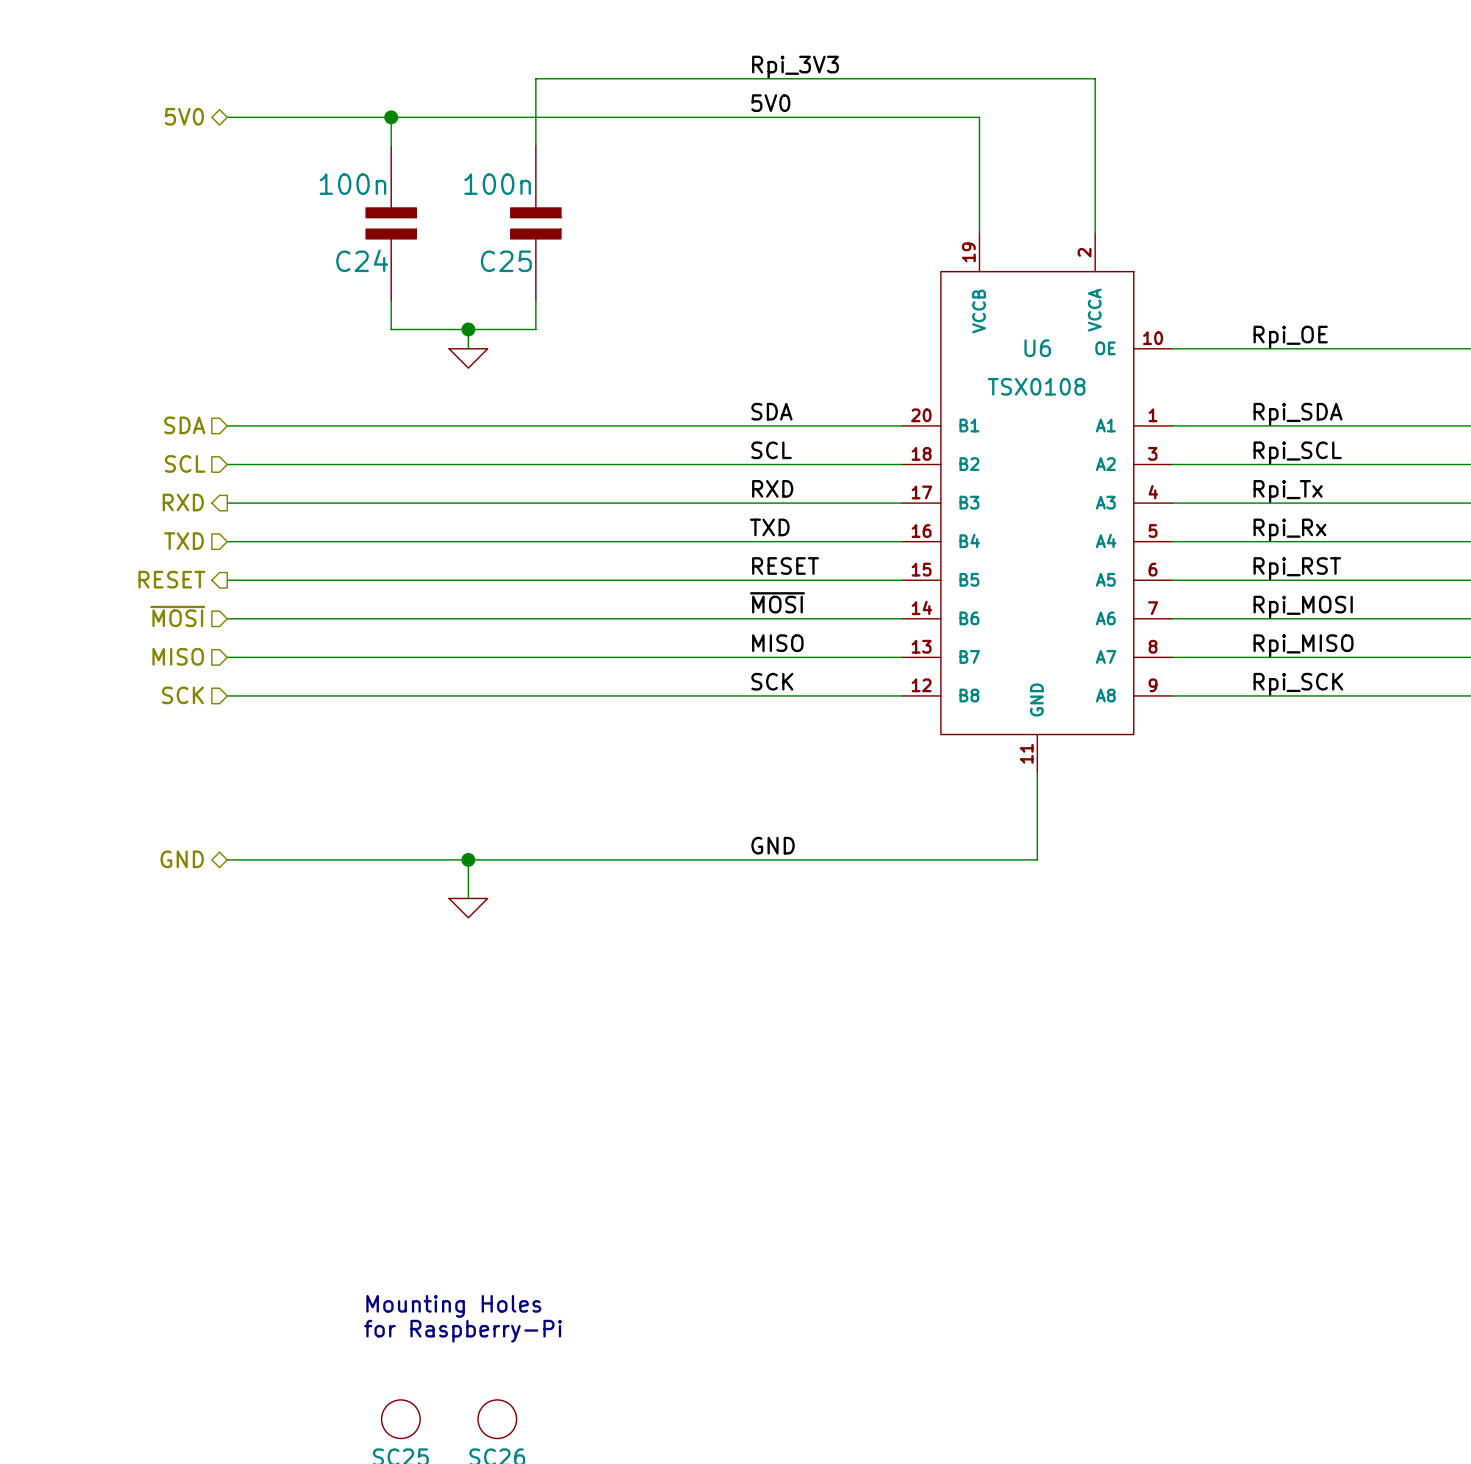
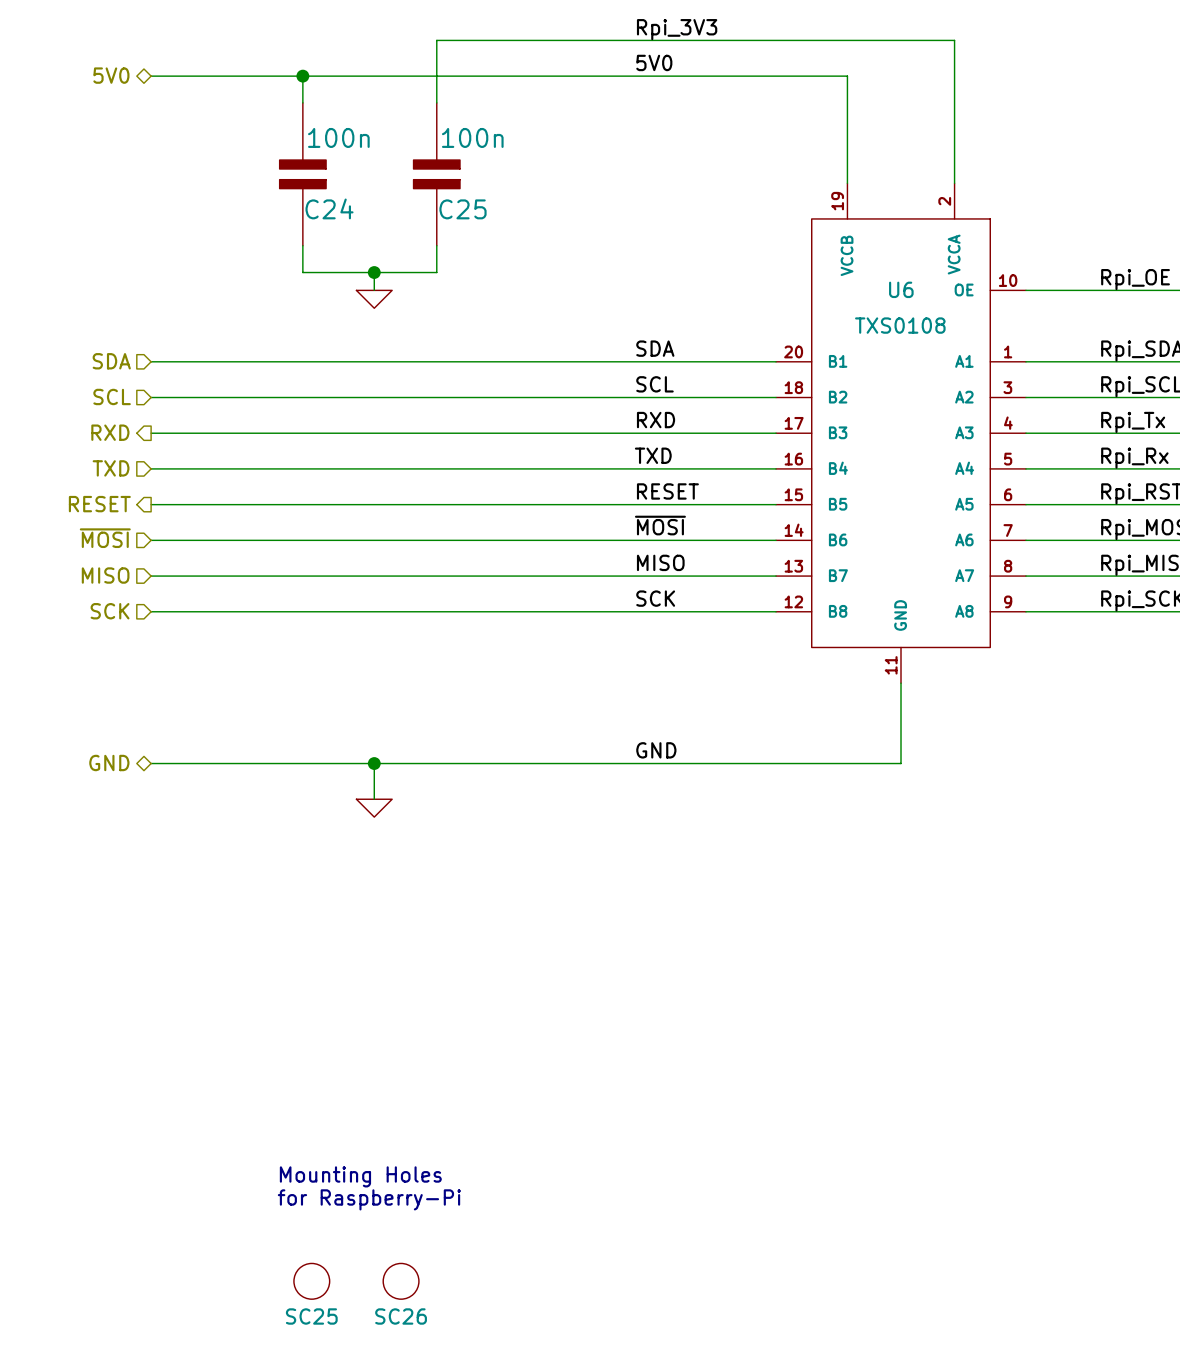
C24 value position: 100n (352, 184) -> 100n (338, 137)
C25 value position: 100n (497, 184) -> 100n (472, 137)
C24 name position: C24 (362, 260) -> C24 (329, 208)
C25 name position: C25 (506, 261) -> C25 (463, 209)
U6 value: TSX0108 (1036, 386) -> TXS0108 (900, 325)

